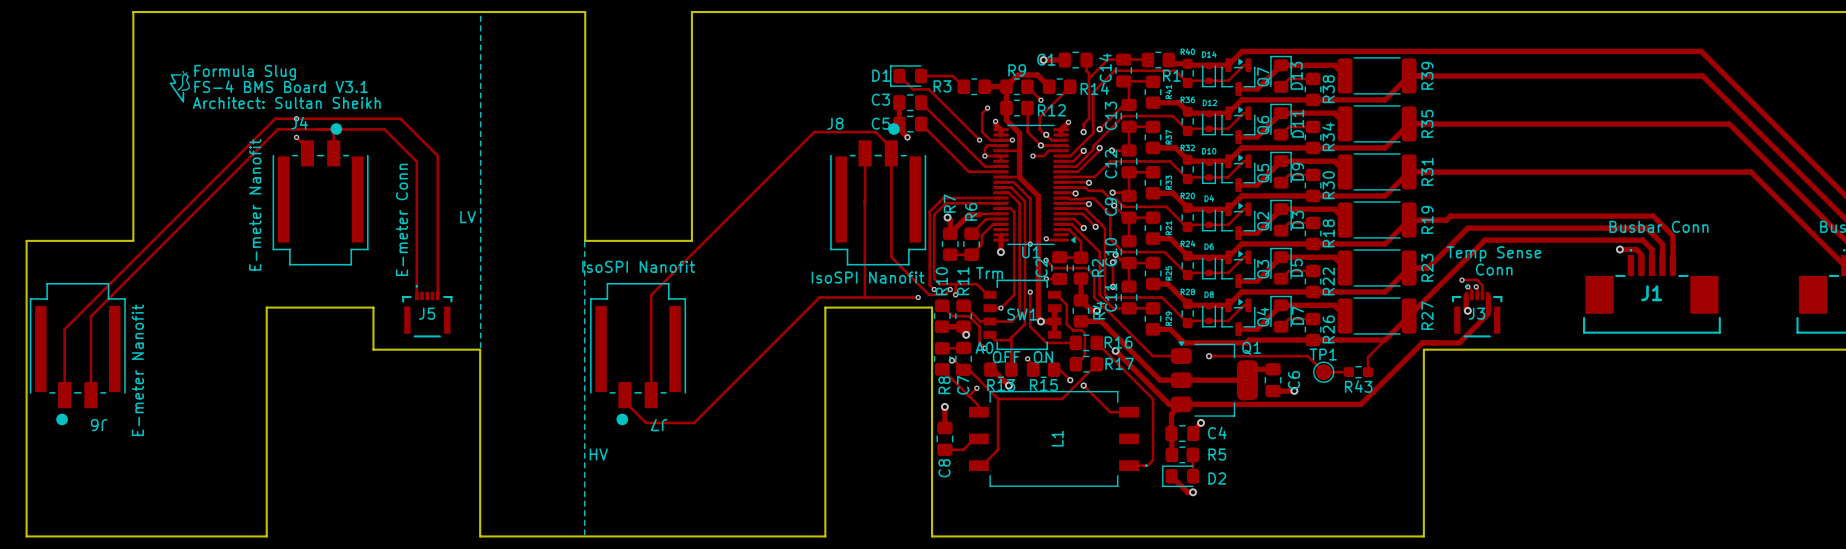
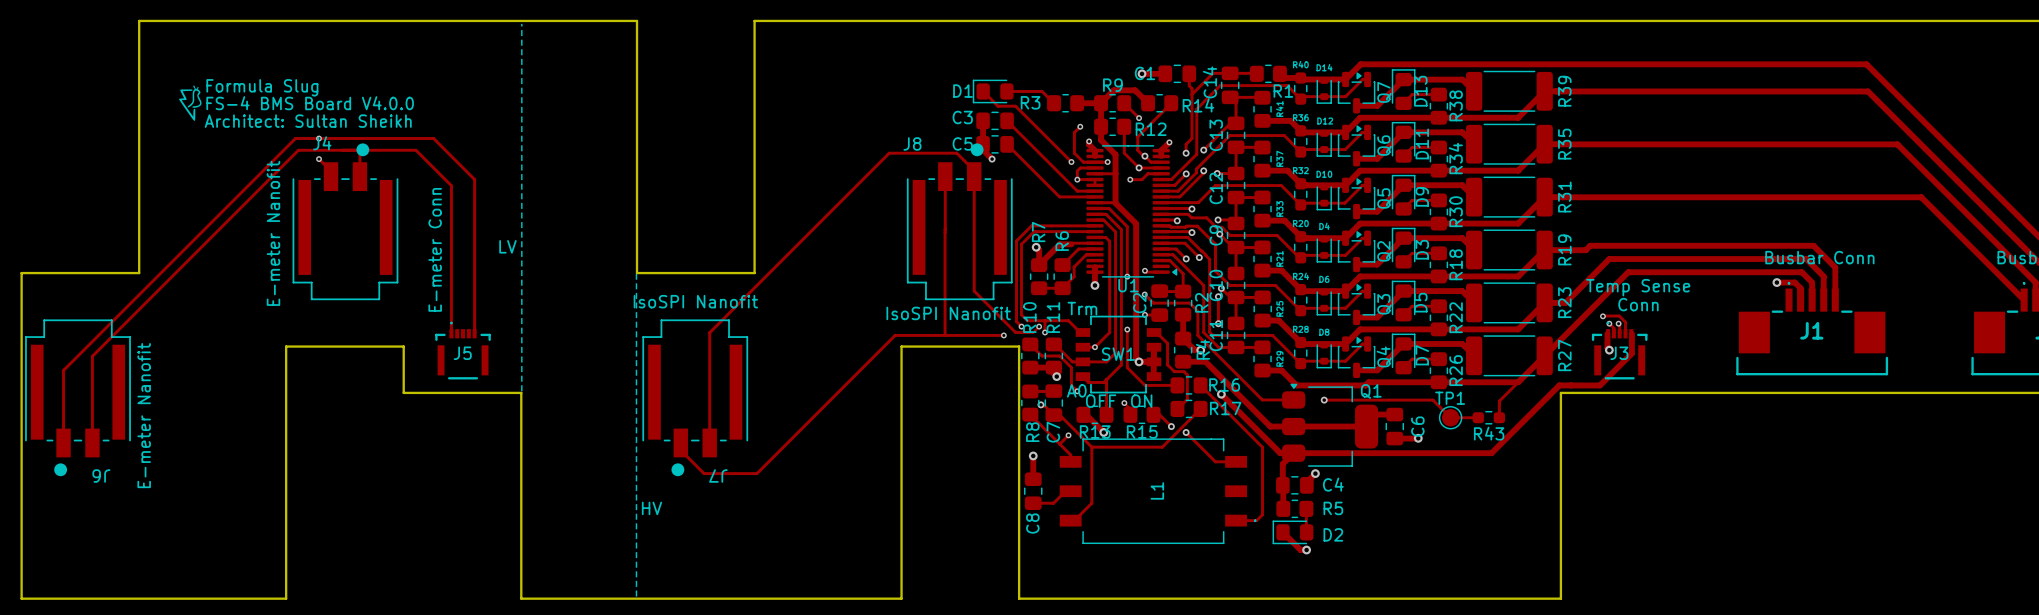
drawing shape: [169, 64, 381, 110] -> [179, 79, 414, 128]

